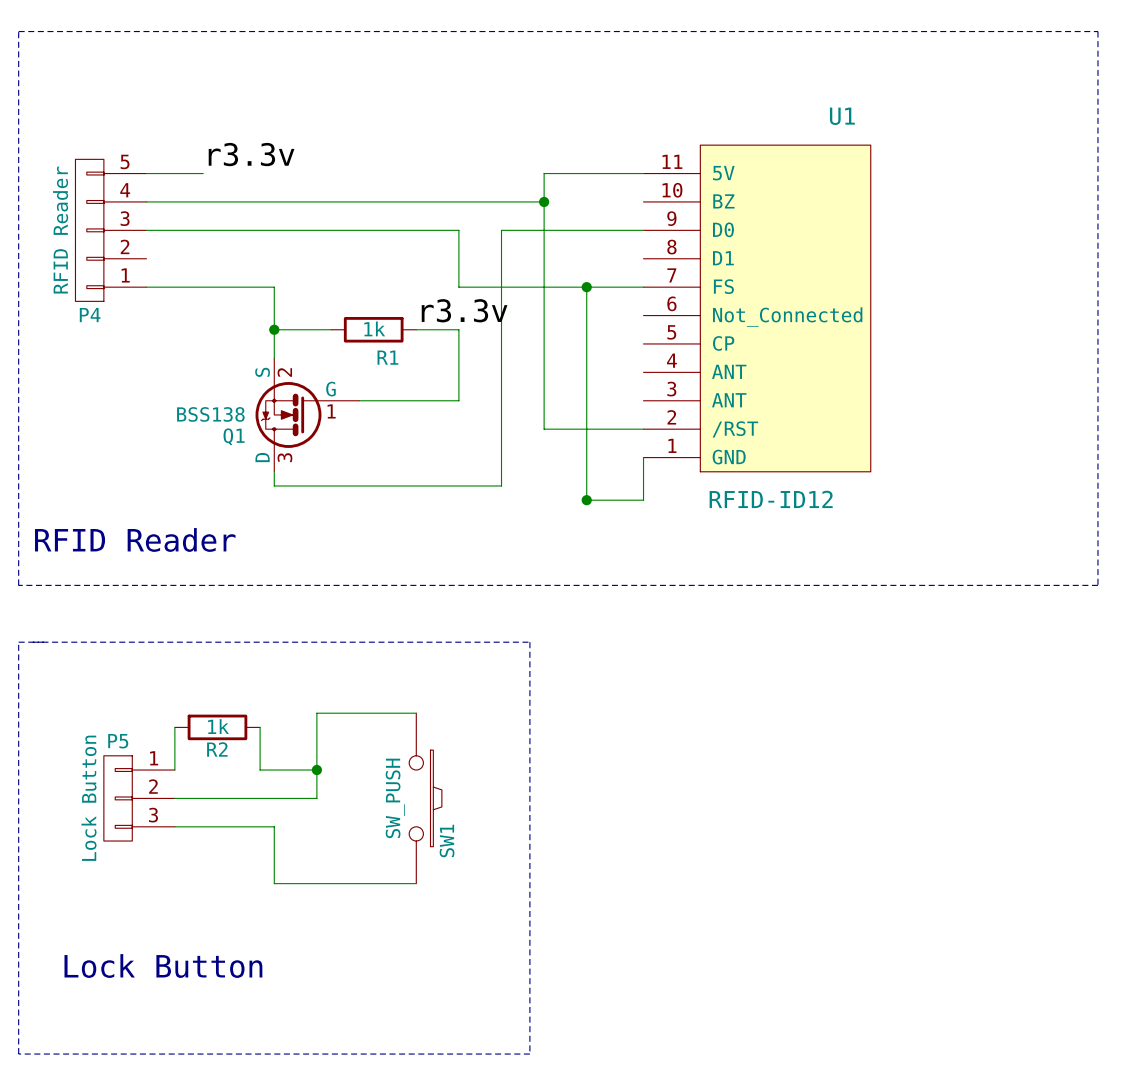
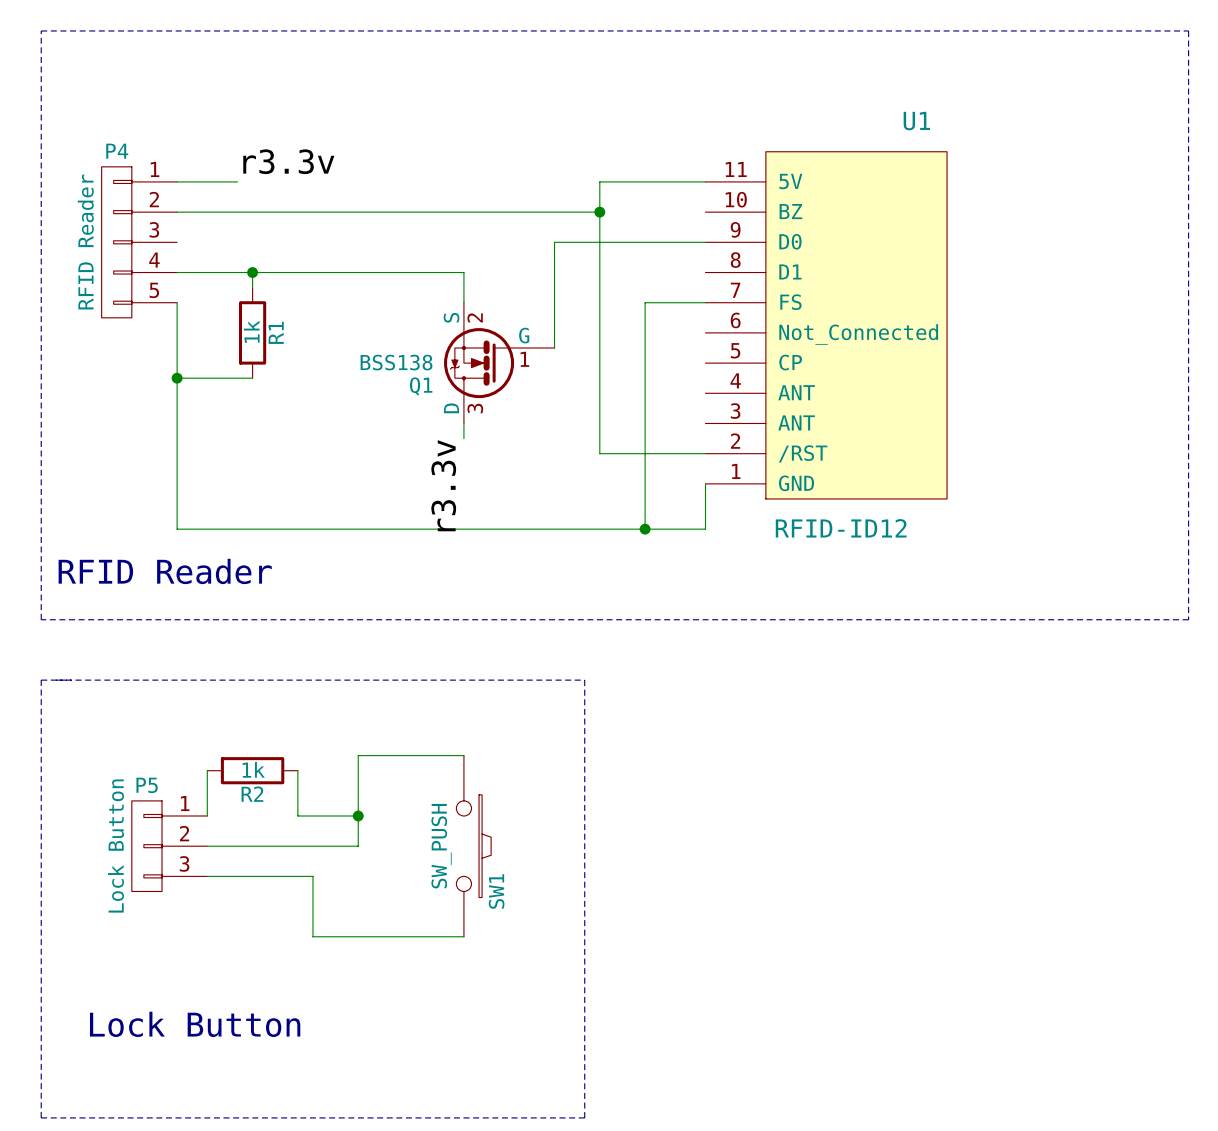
P4 flip: as is (89, 230) -> up-down (116, 242)
wire: (146, 230) (458, 230) (458, 287) (586, 287) -> none
wire: none -> (177, 272) (463, 272) (463, 302)
wire: none -> (252, 272) (252, 287)
junction: none -> (252, 272)
wire: (146, 287) (274, 287) (274, 358) -> (177, 302) (177, 529) (645, 529)
junction: (586, 287) -> none
label rotation: 0° (464, 310) -> 90° counterclockwise (443, 485)
label position: r3.3v (464, 310) -> r3.3v (443, 485)
wire: (274, 329) (331, 329) -> none
junction: (274, 329) -> none
R1 rotation: 0° (373, 329) -> 90° clockwise (252, 332)
R1 position: (373, 329) -> (252, 332)
wire: (416, 329) (458, 329) (458, 400) (359, 400) -> none
wire: (501, 329) (501, 485) (274, 485) (274, 471) -> none
R1 name position: R1 (387, 357) -> R1 (276, 332)
wire: none -> (177, 378) (252, 378)
junction: none -> (177, 378)
wire: none -> (463, 423) (463, 438)
Q1 position: (307, 414) -> (499, 363)

